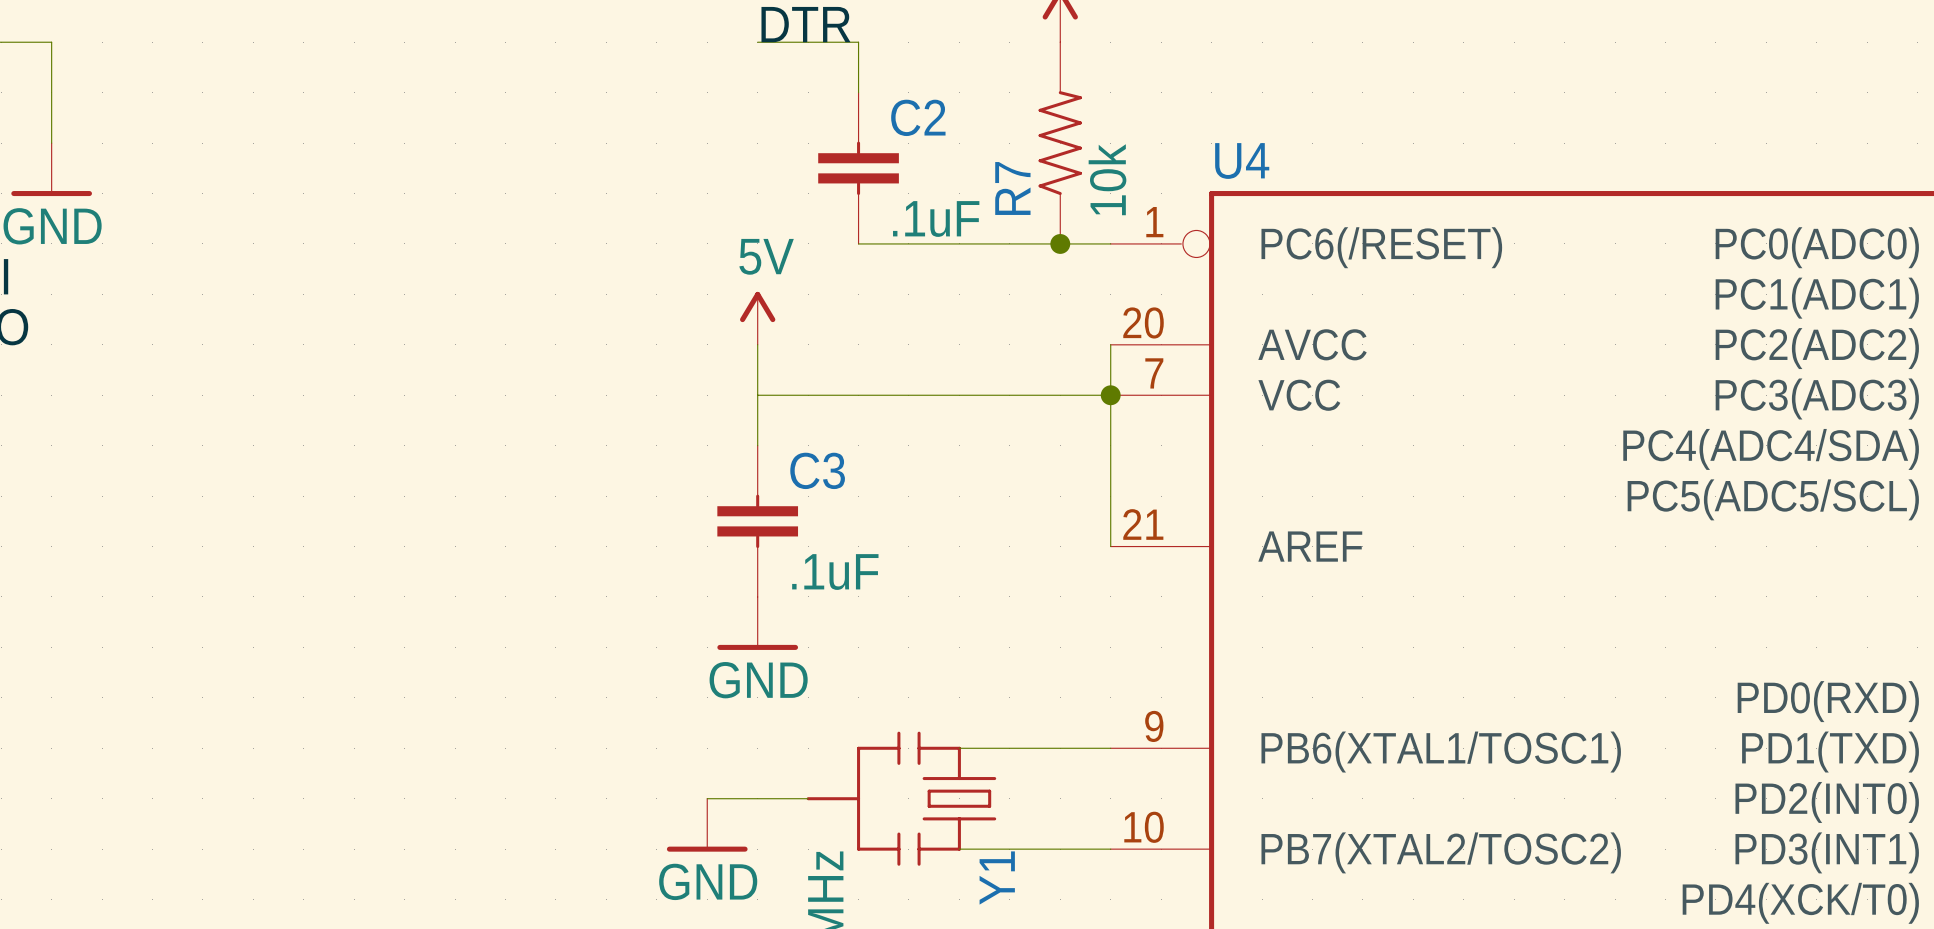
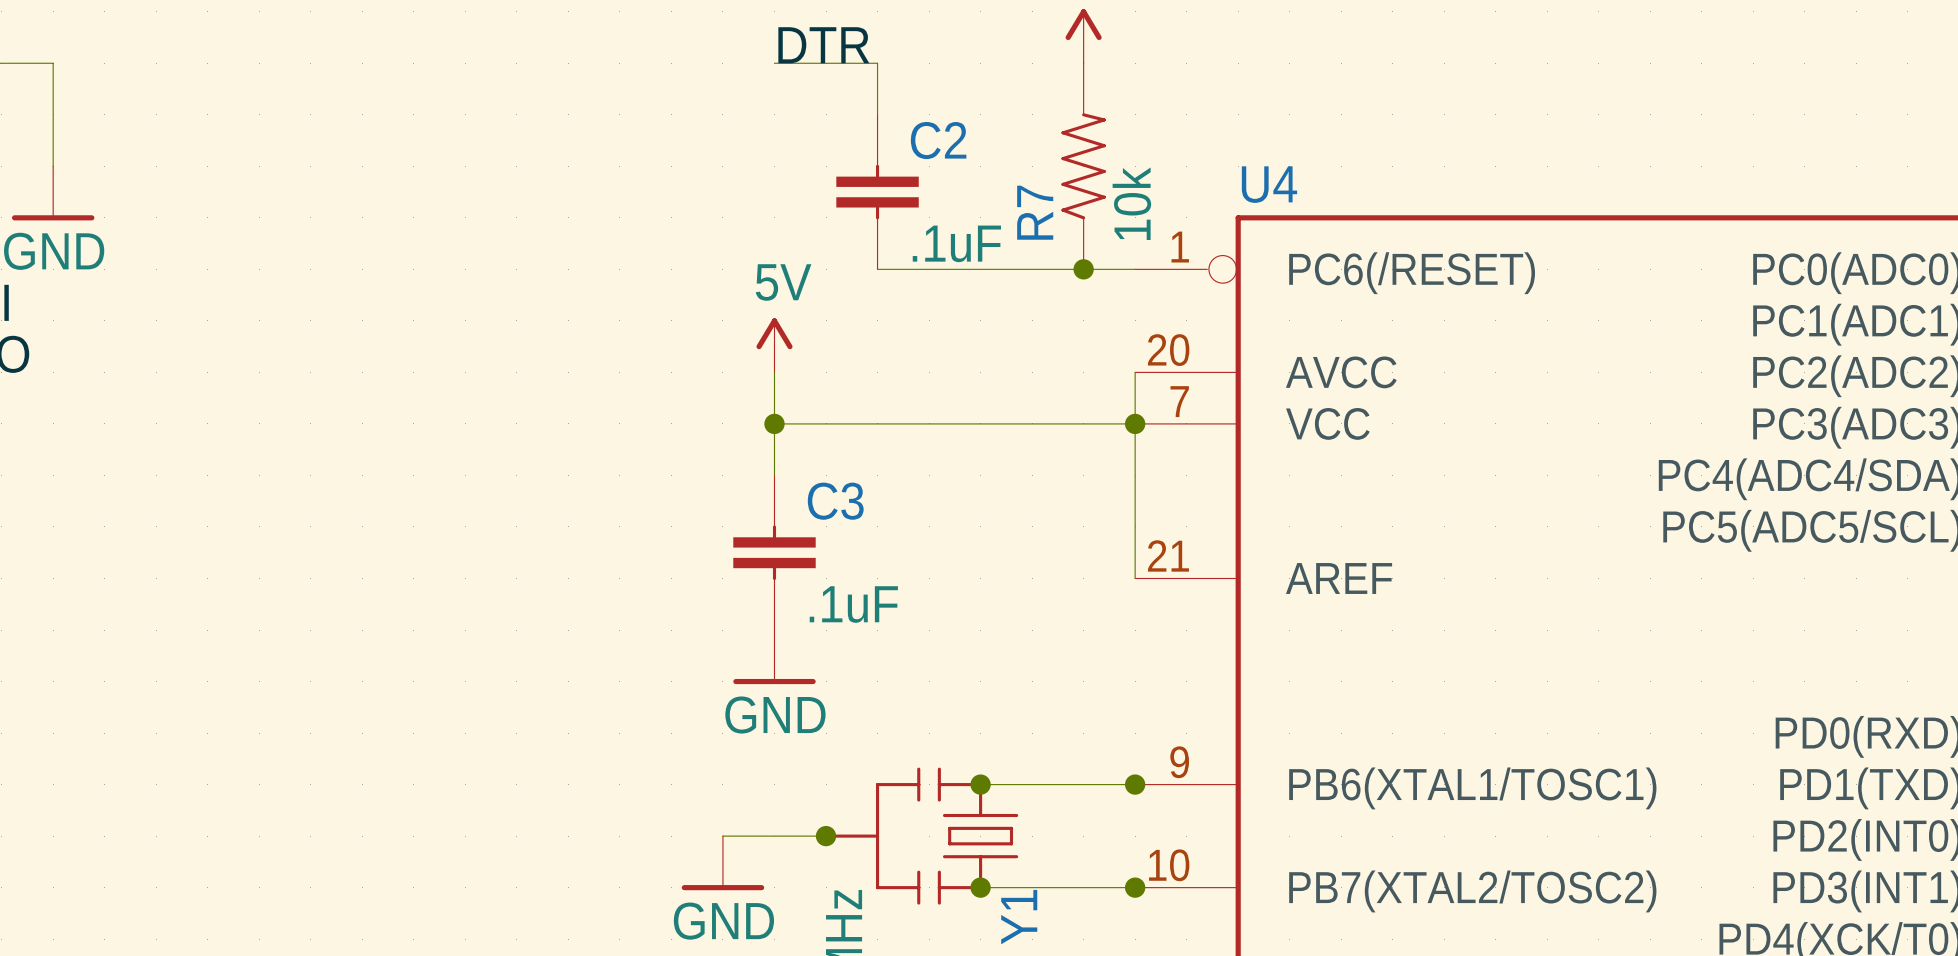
junction: none -> (774, 423)
junction: none -> (980, 784)
junction: none -> (1135, 784)
junction: none -> (826, 836)
junction: none -> (980, 887)
junction: none -> (1135, 887)

